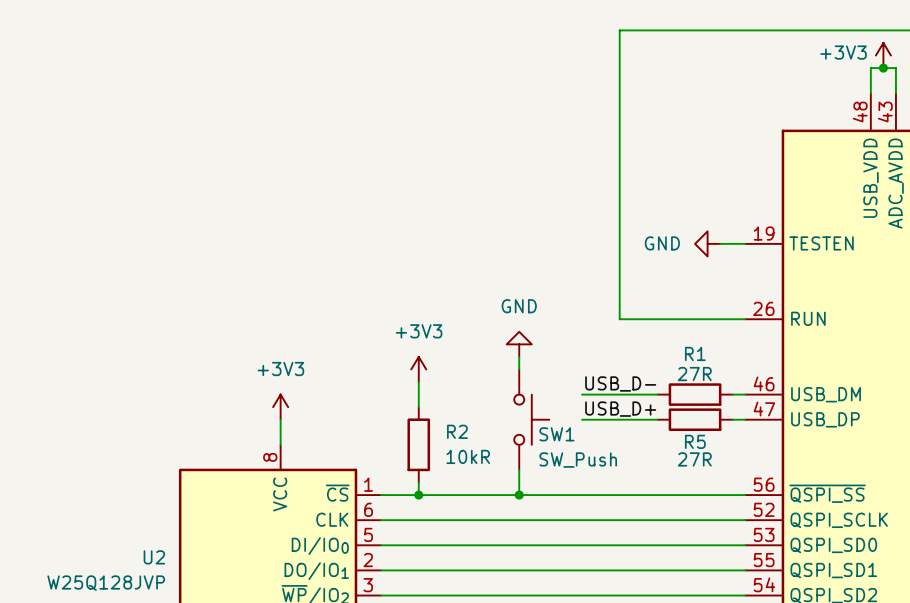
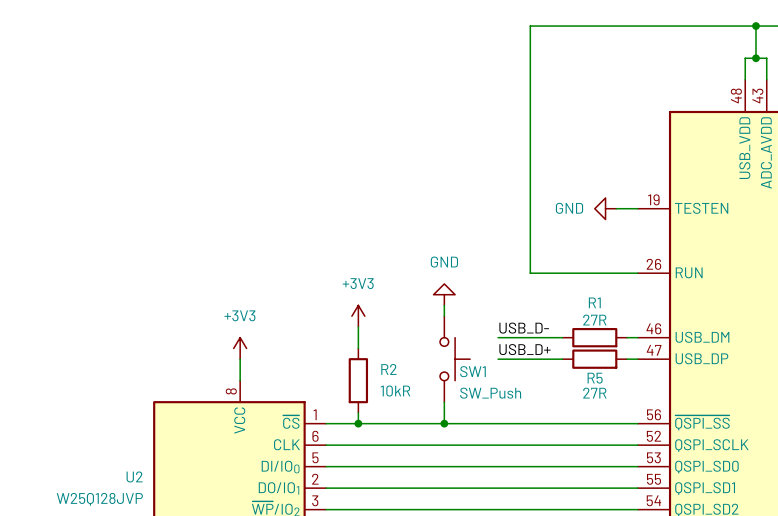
junction: none -> (755, 26)
power symbol: +3V3 (883, 55) -> none

